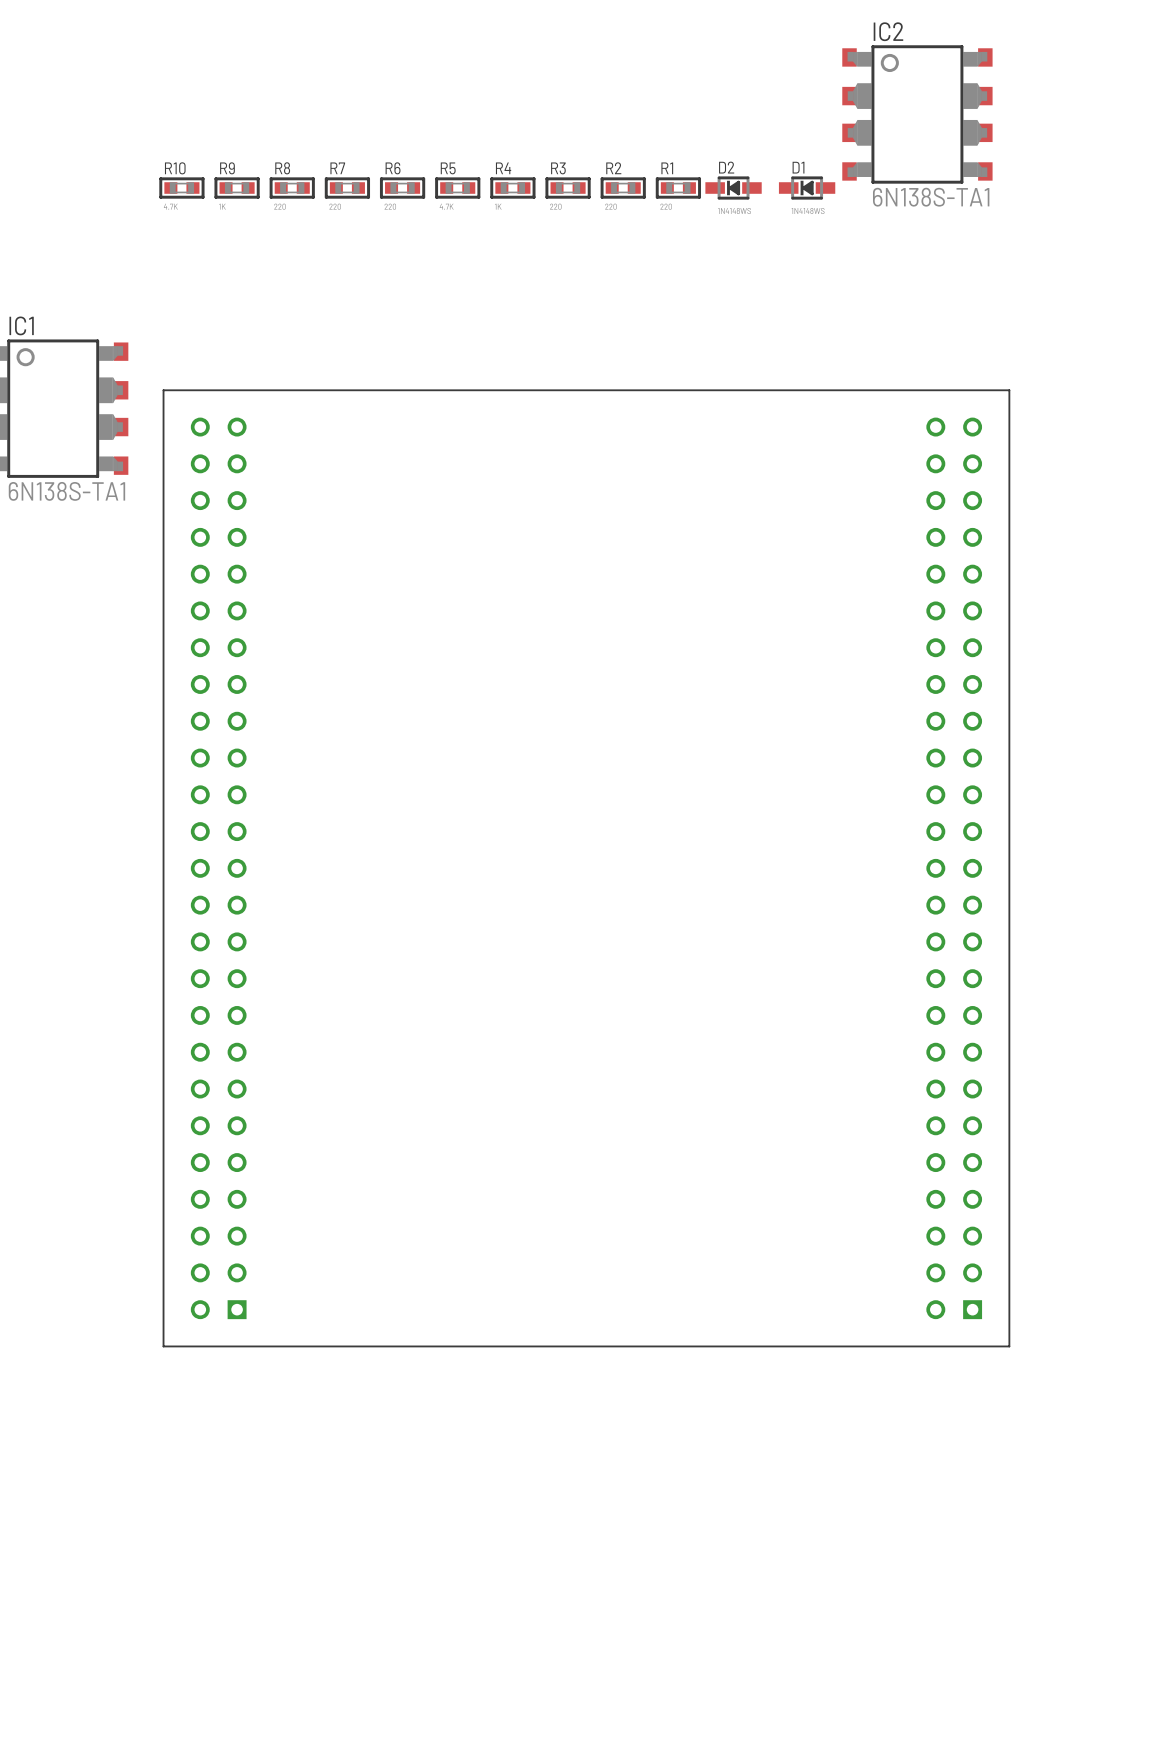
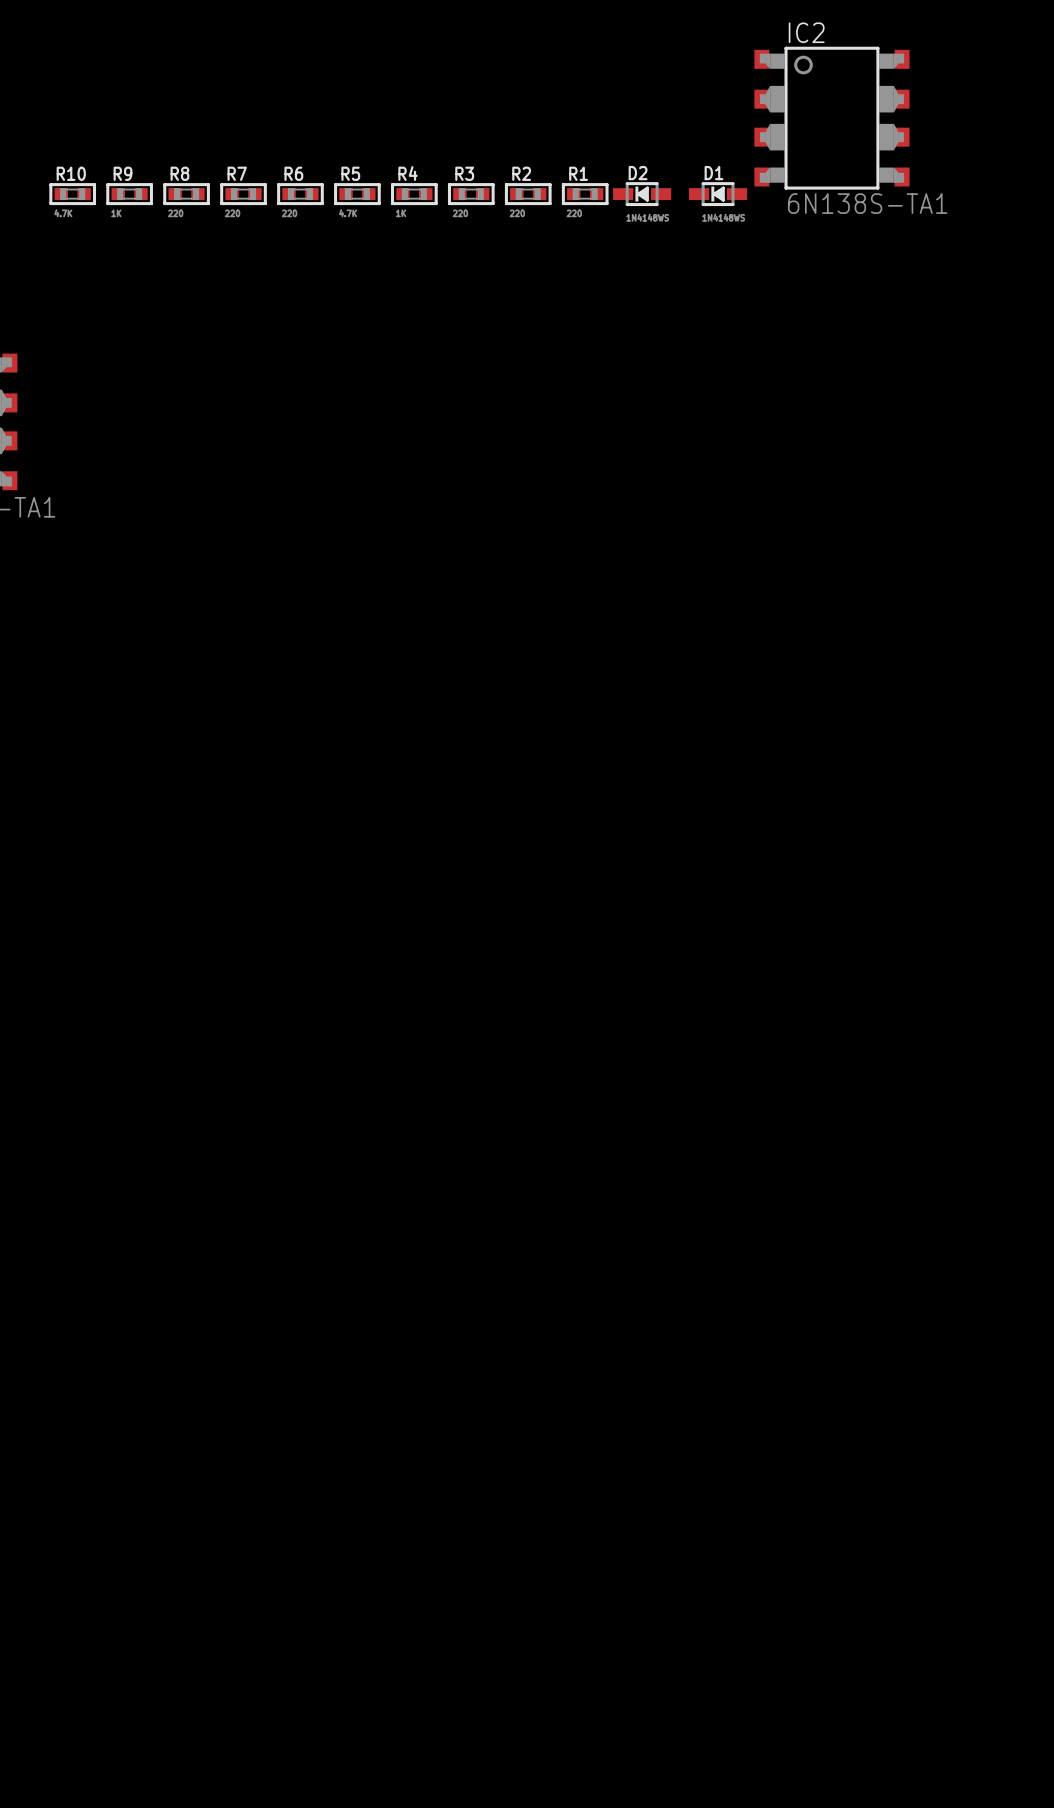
part: (586, 868) -> none

